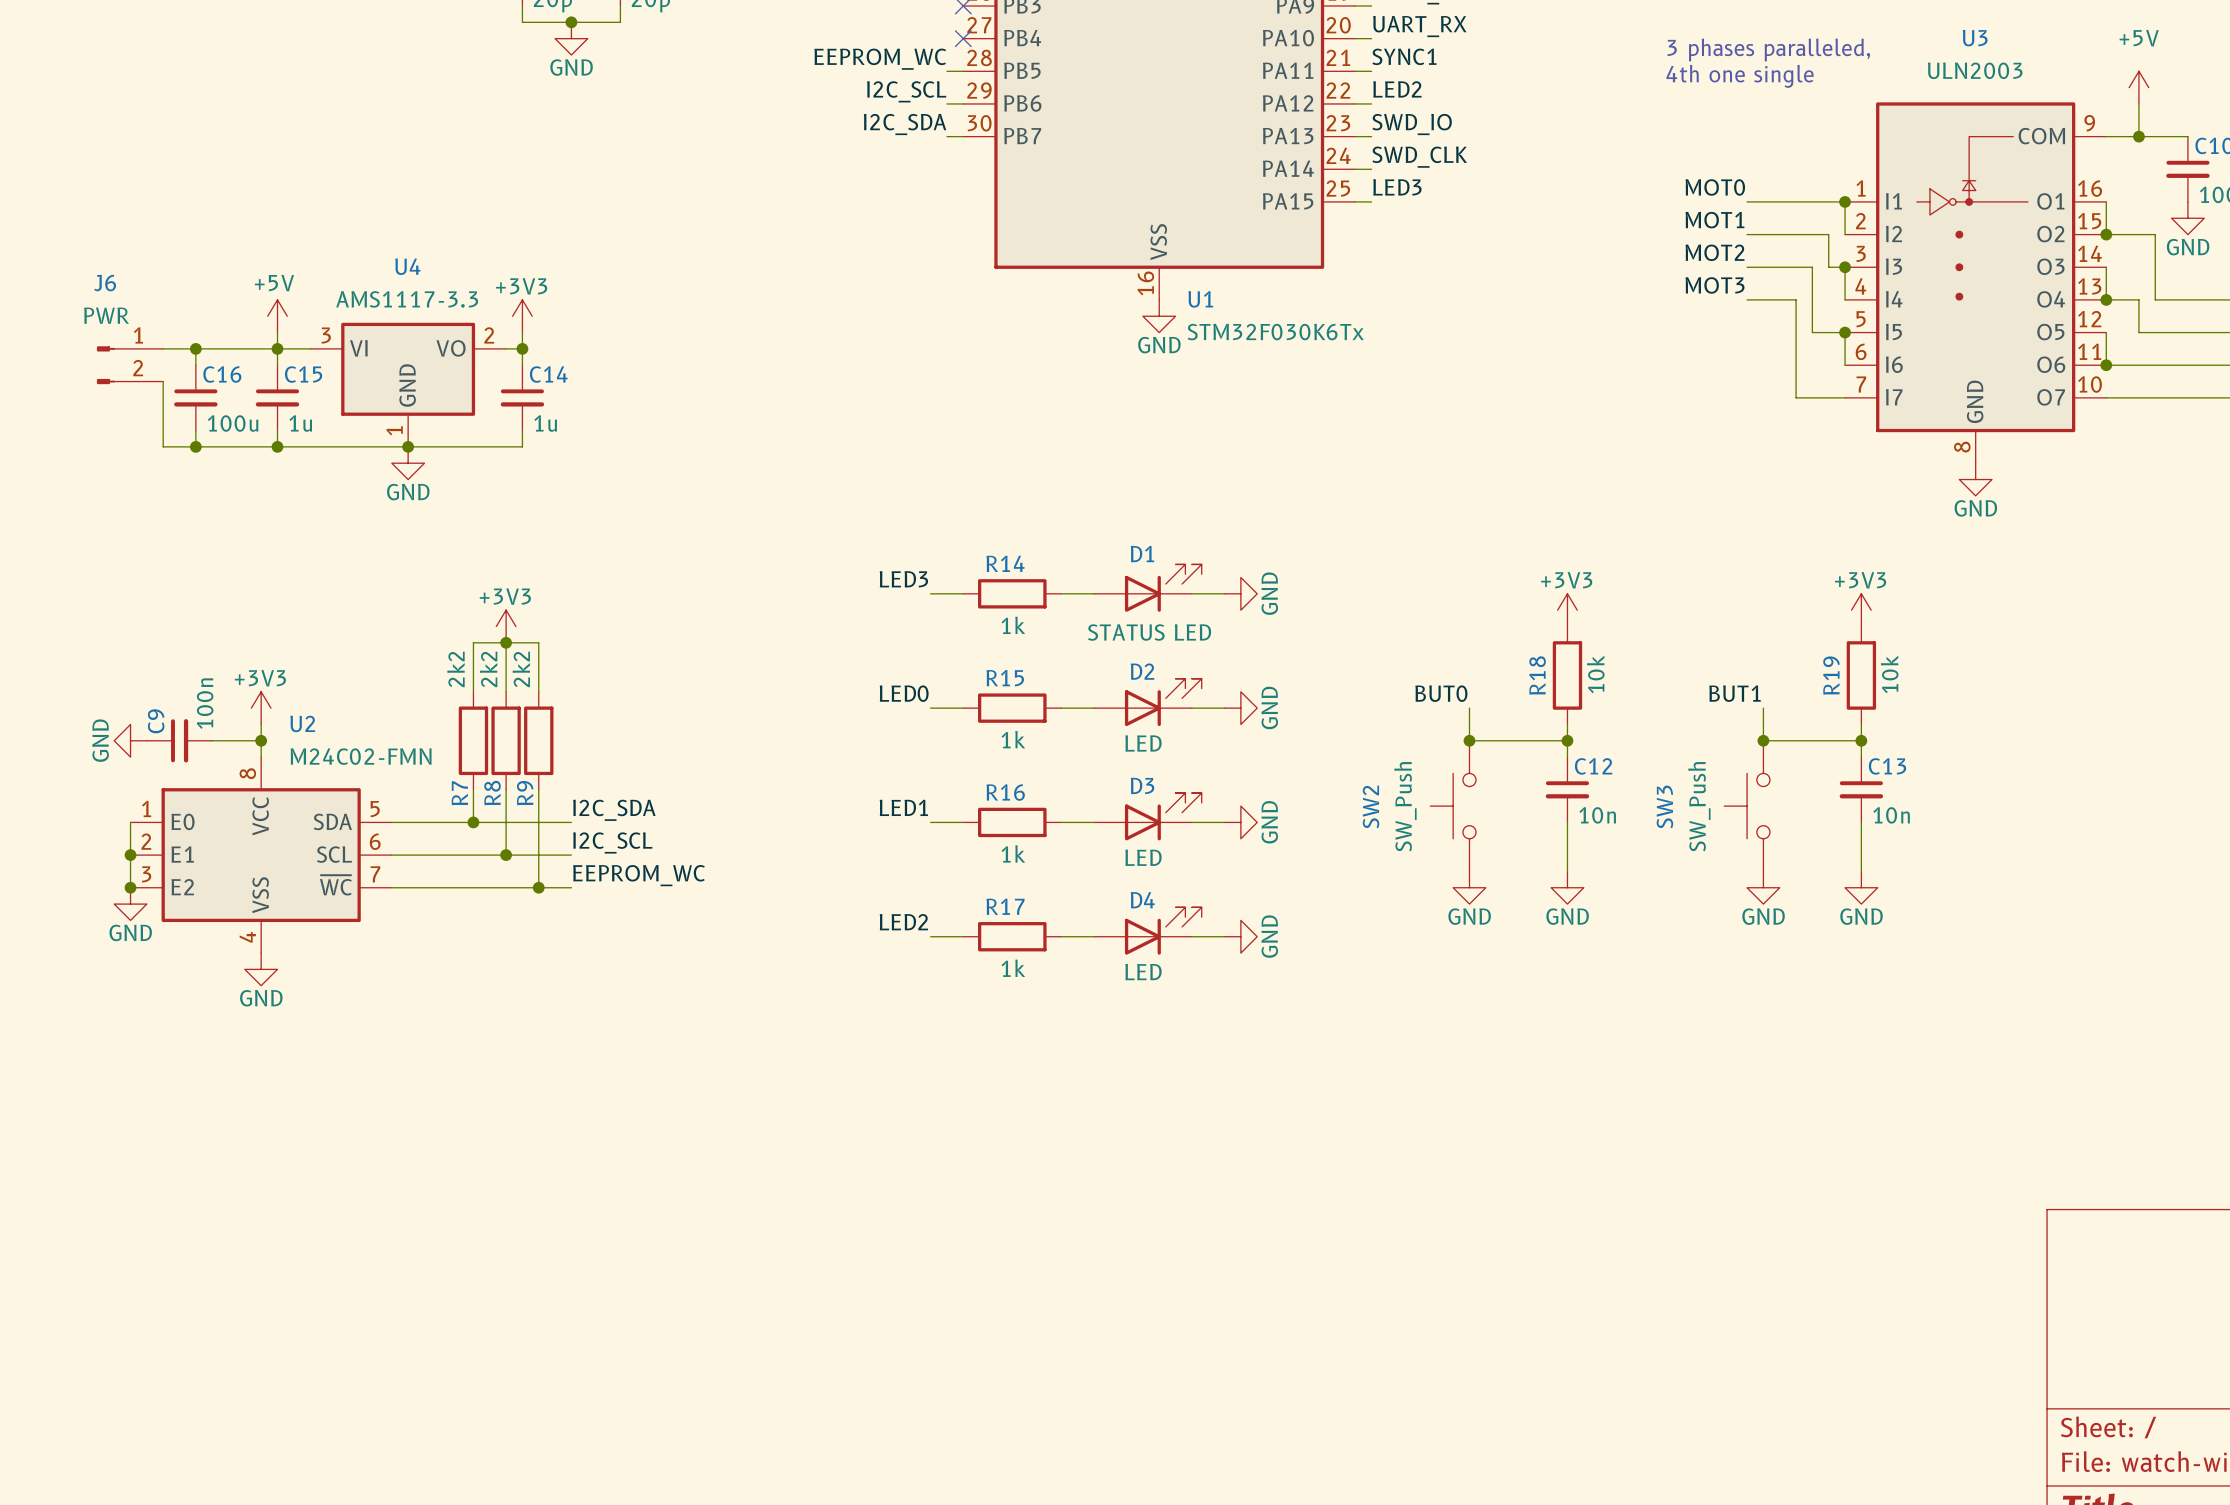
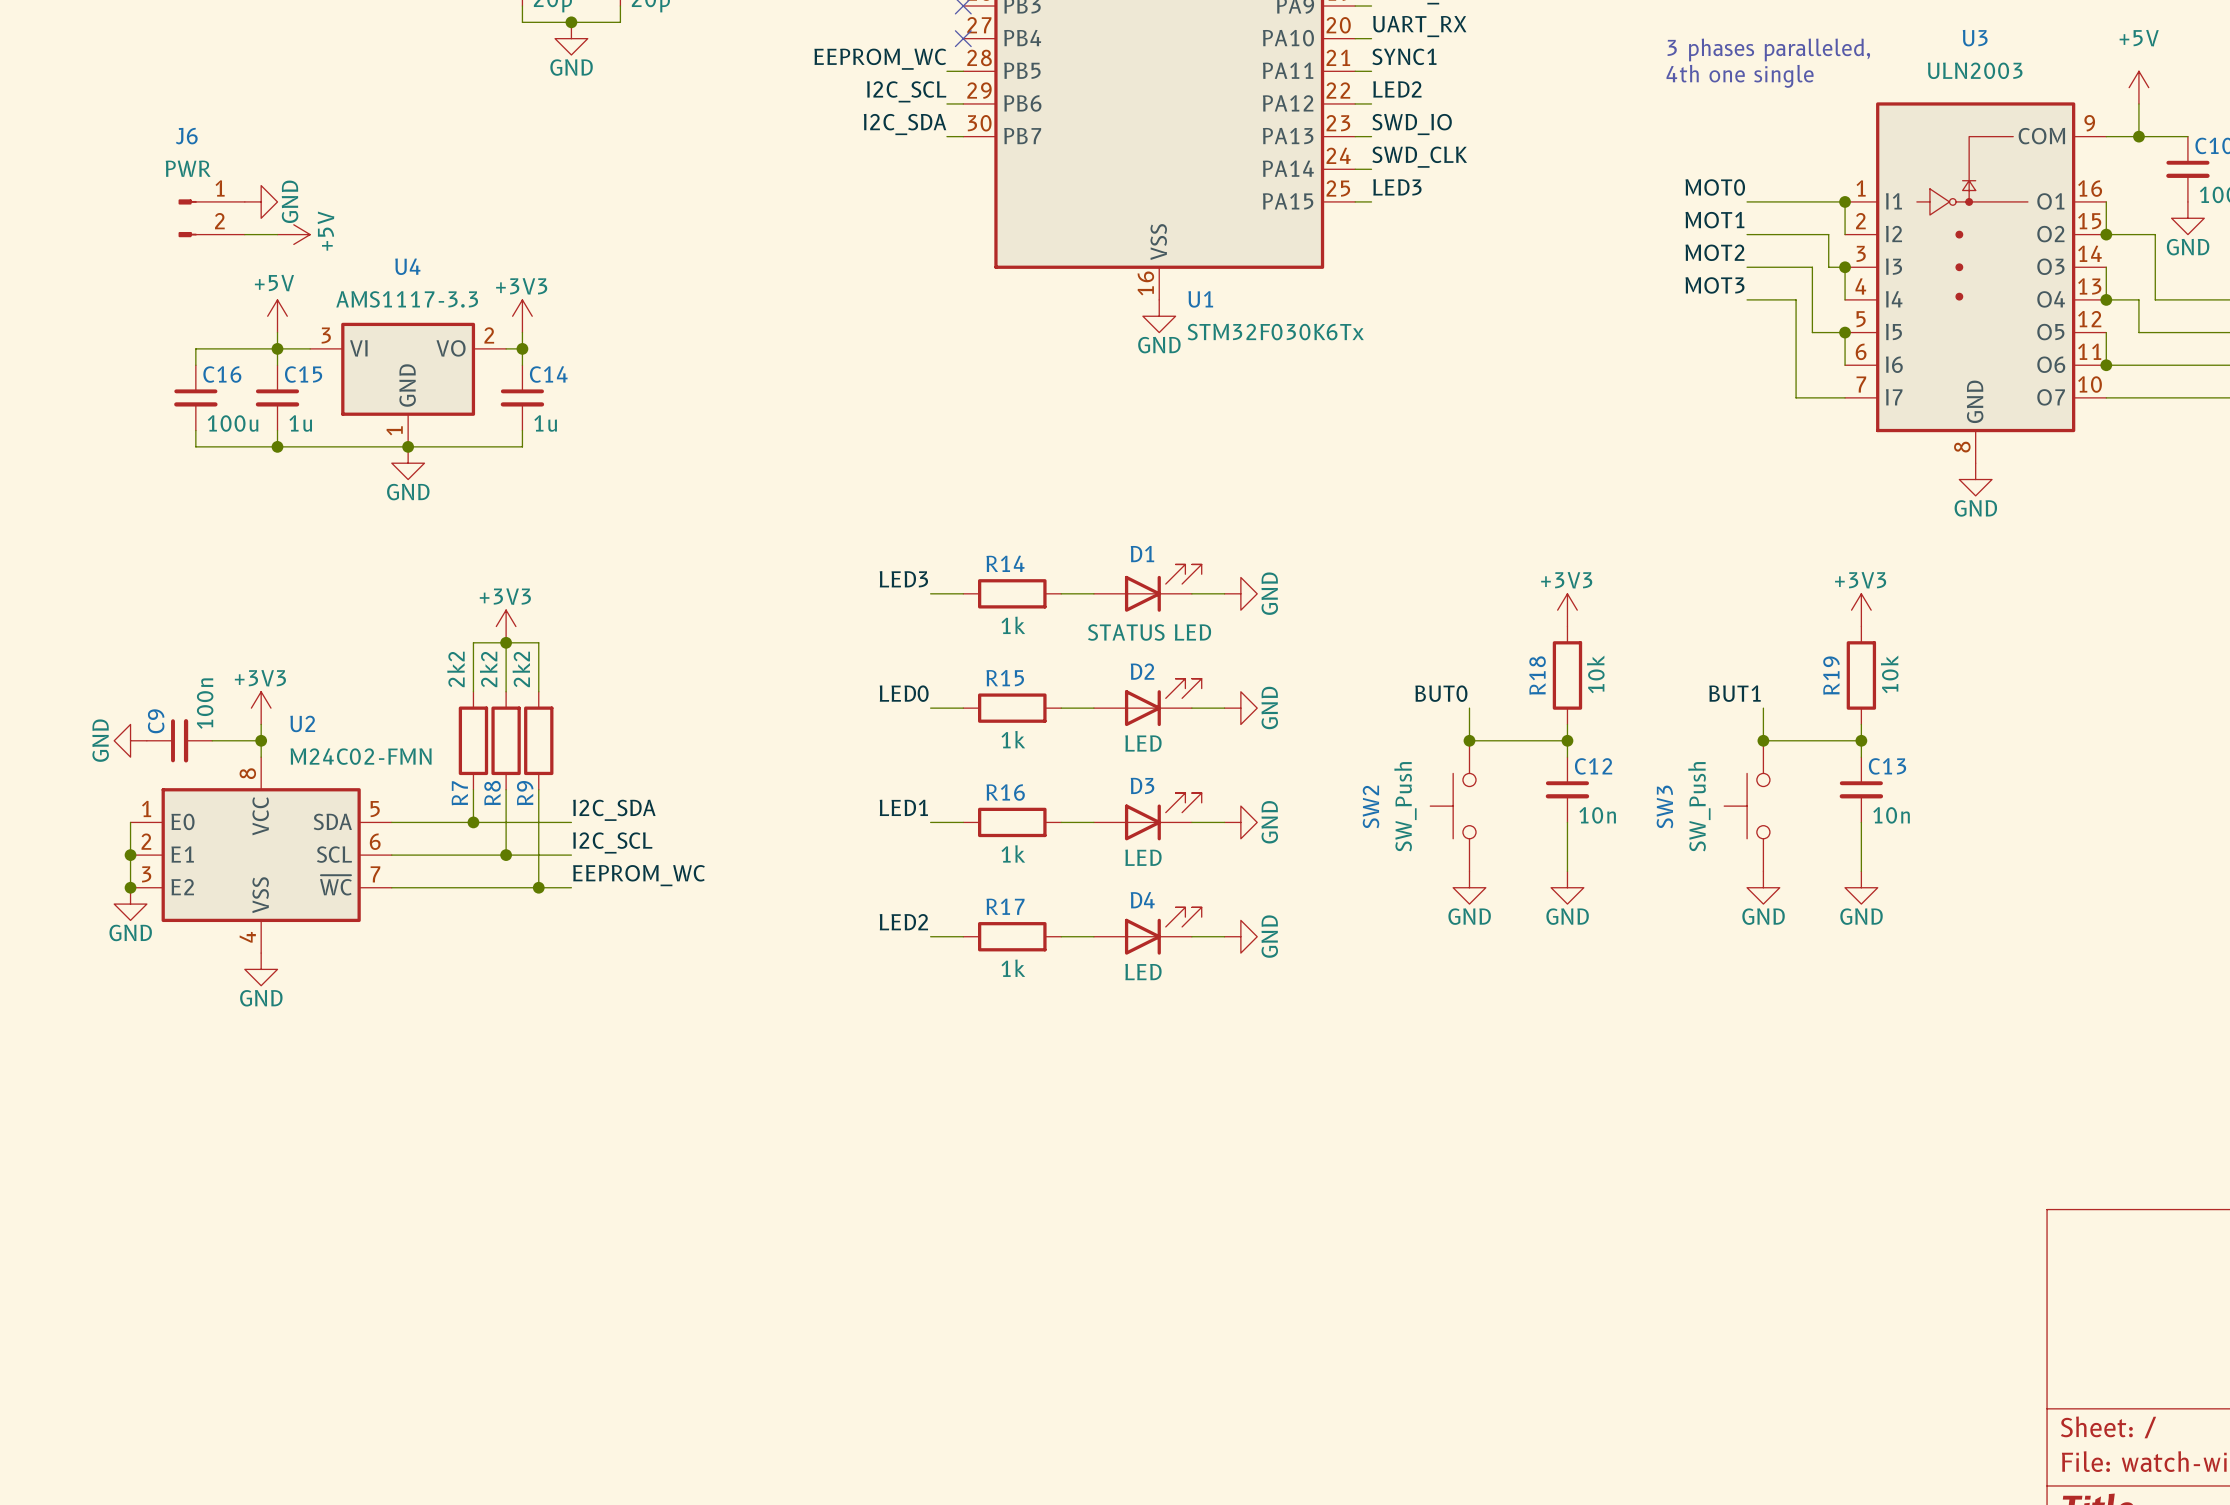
power symbol: none -> GND (261, 201)
power symbol: none -> +5V (293, 234)
wire: (163, 348) (195, 348) -> (244, 234) (277, 234)
junction: (195, 348) -> none
J6 position: (130, 365) -> (211, 218)
wire: (163, 381) (163, 446) (195, 446) -> none
junction: (195, 446) -> none

